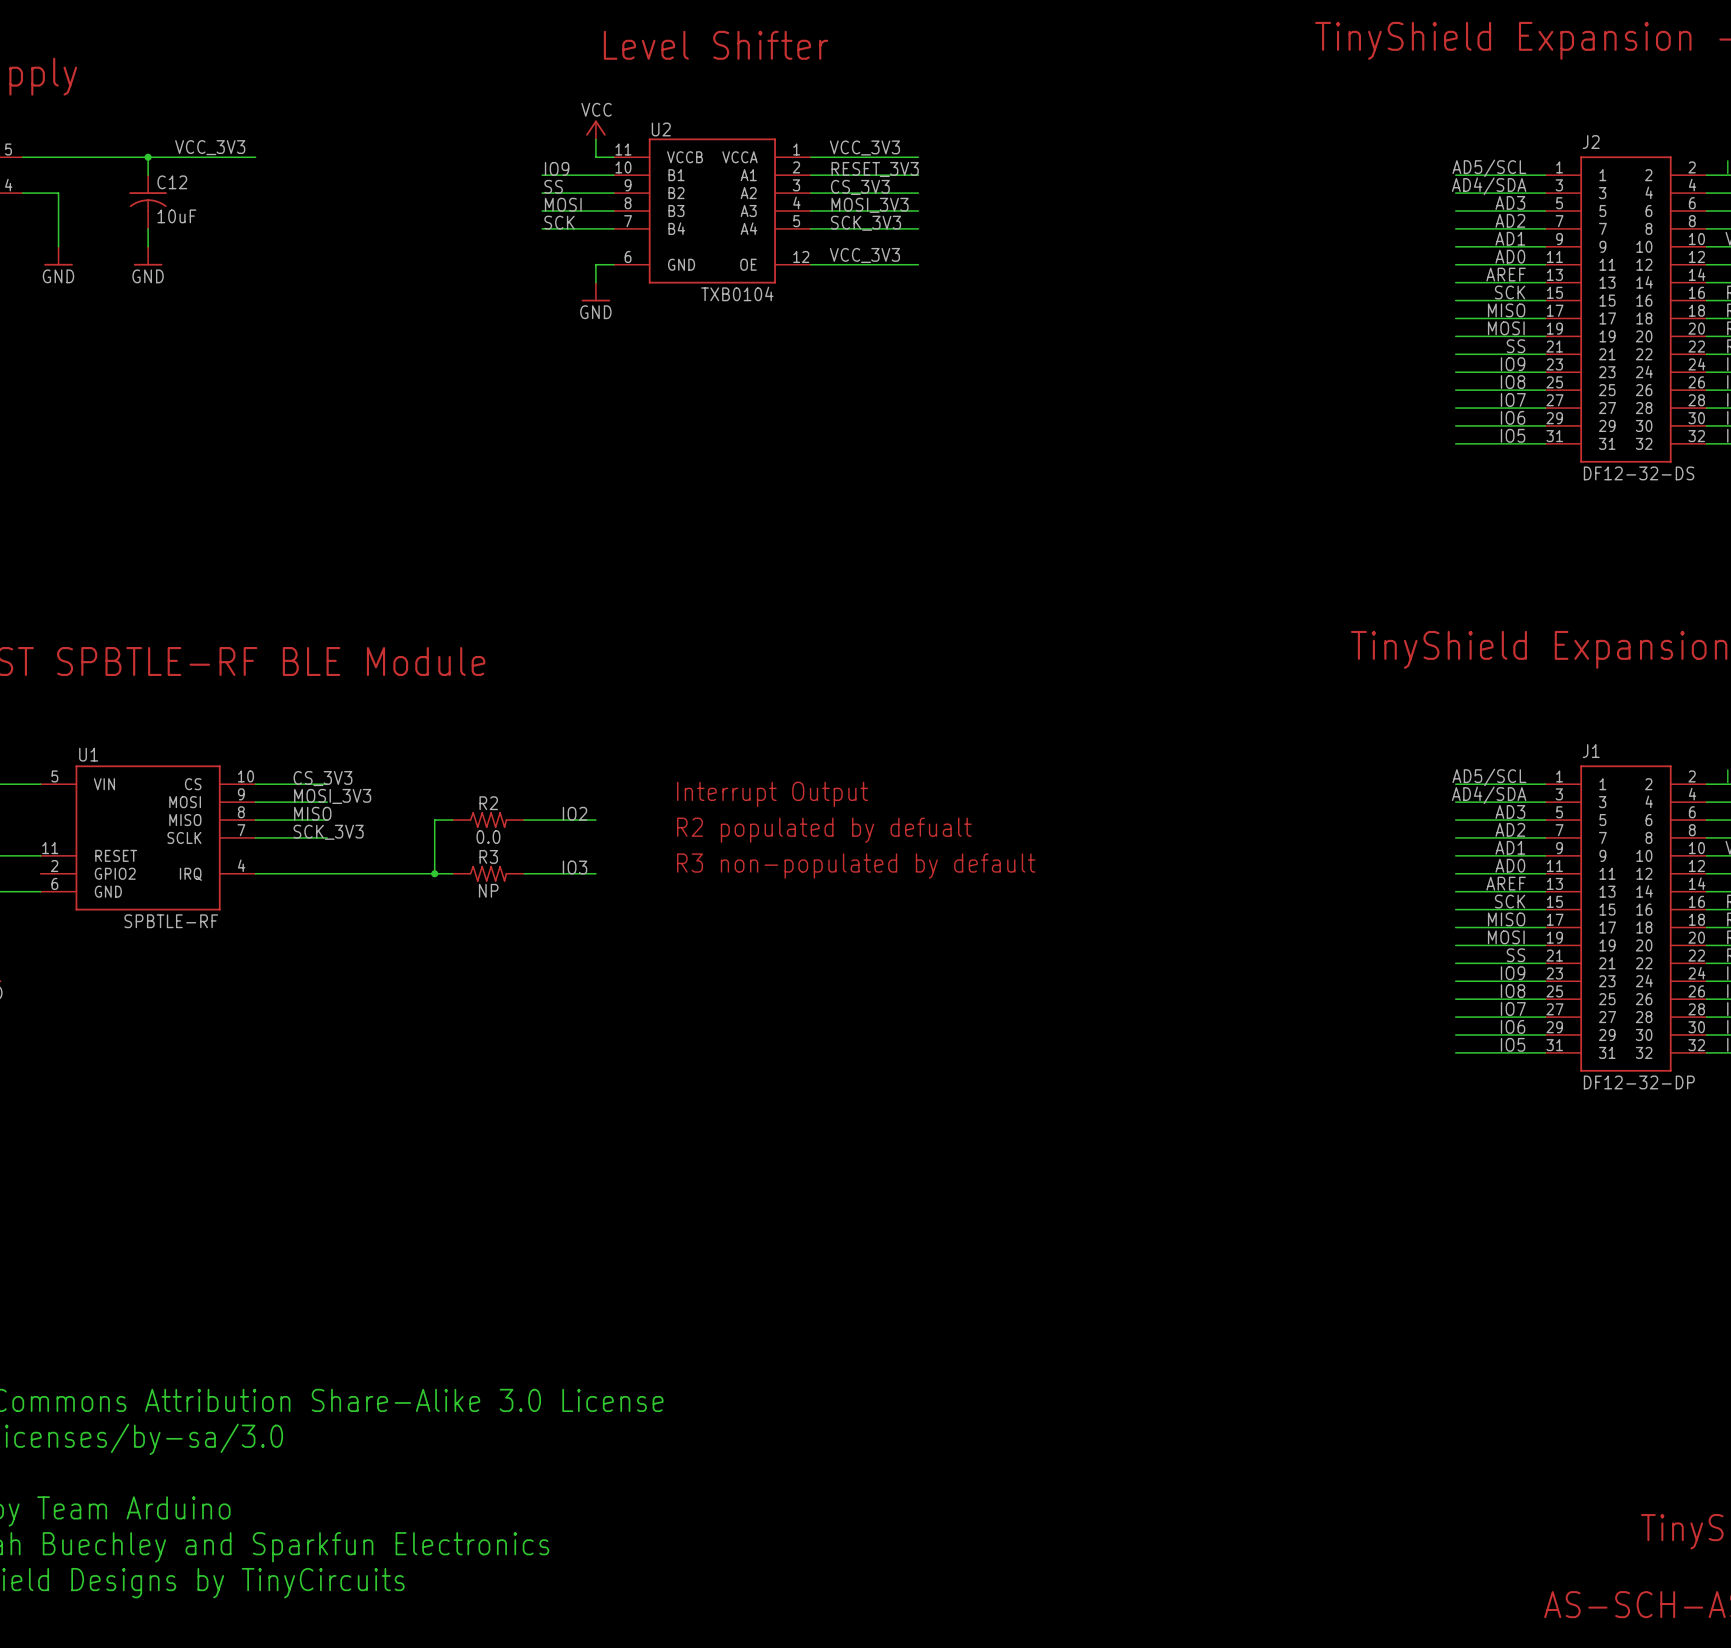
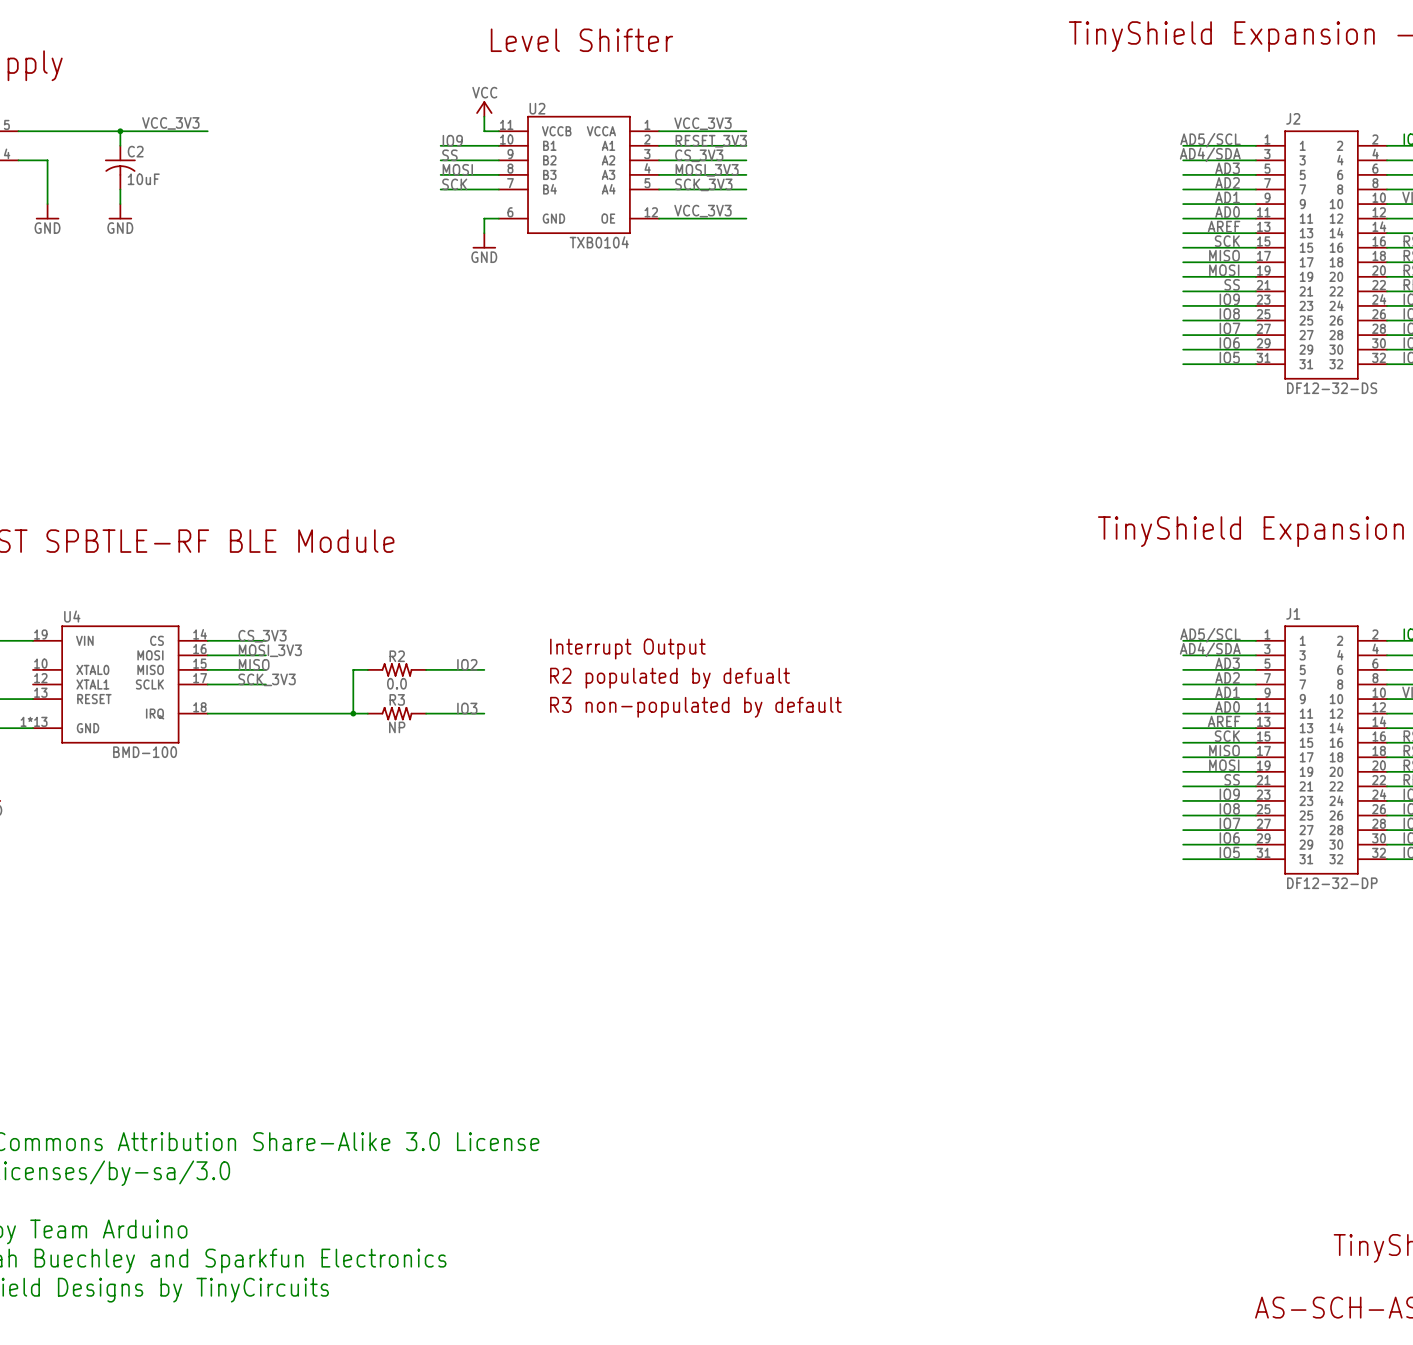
C12 name: C12 (172, 182) -> C2 (135, 151)
U1: SPBTLE-RF (148, 837) -> none
U4: none -> BMD-100 (120, 684)

